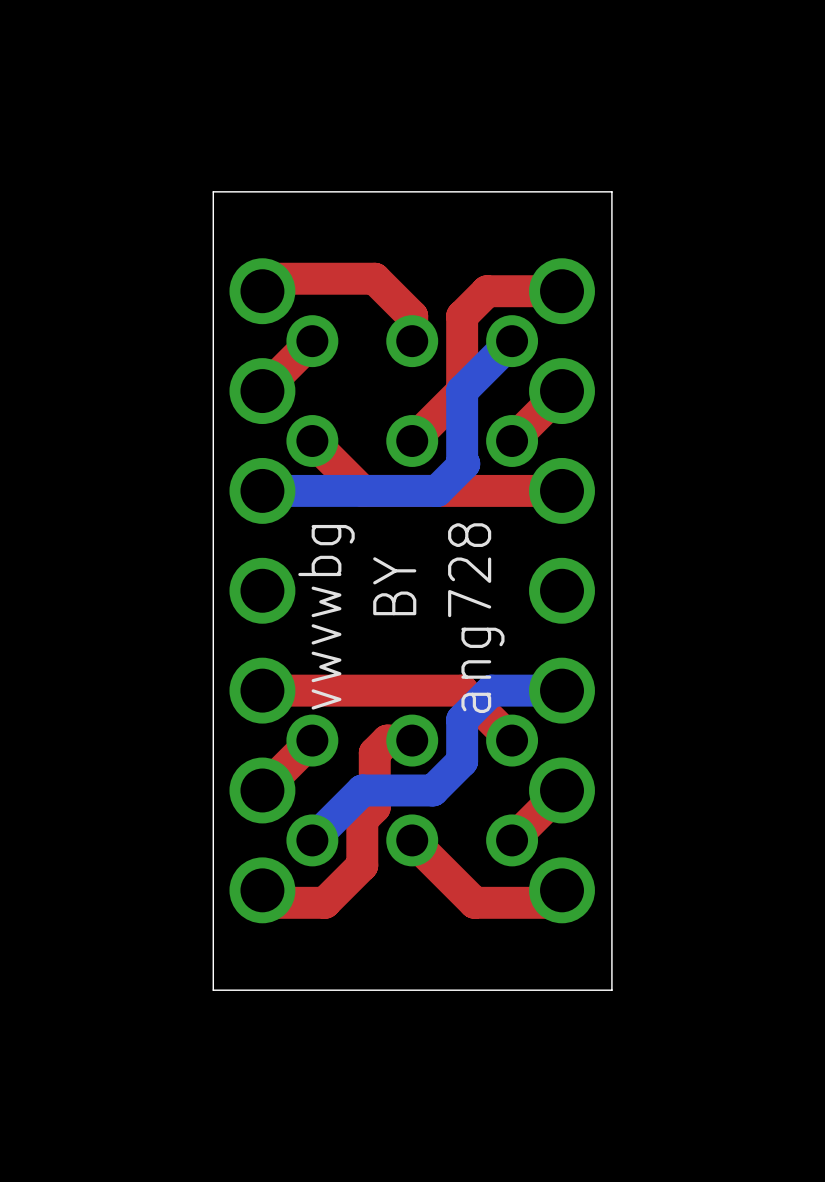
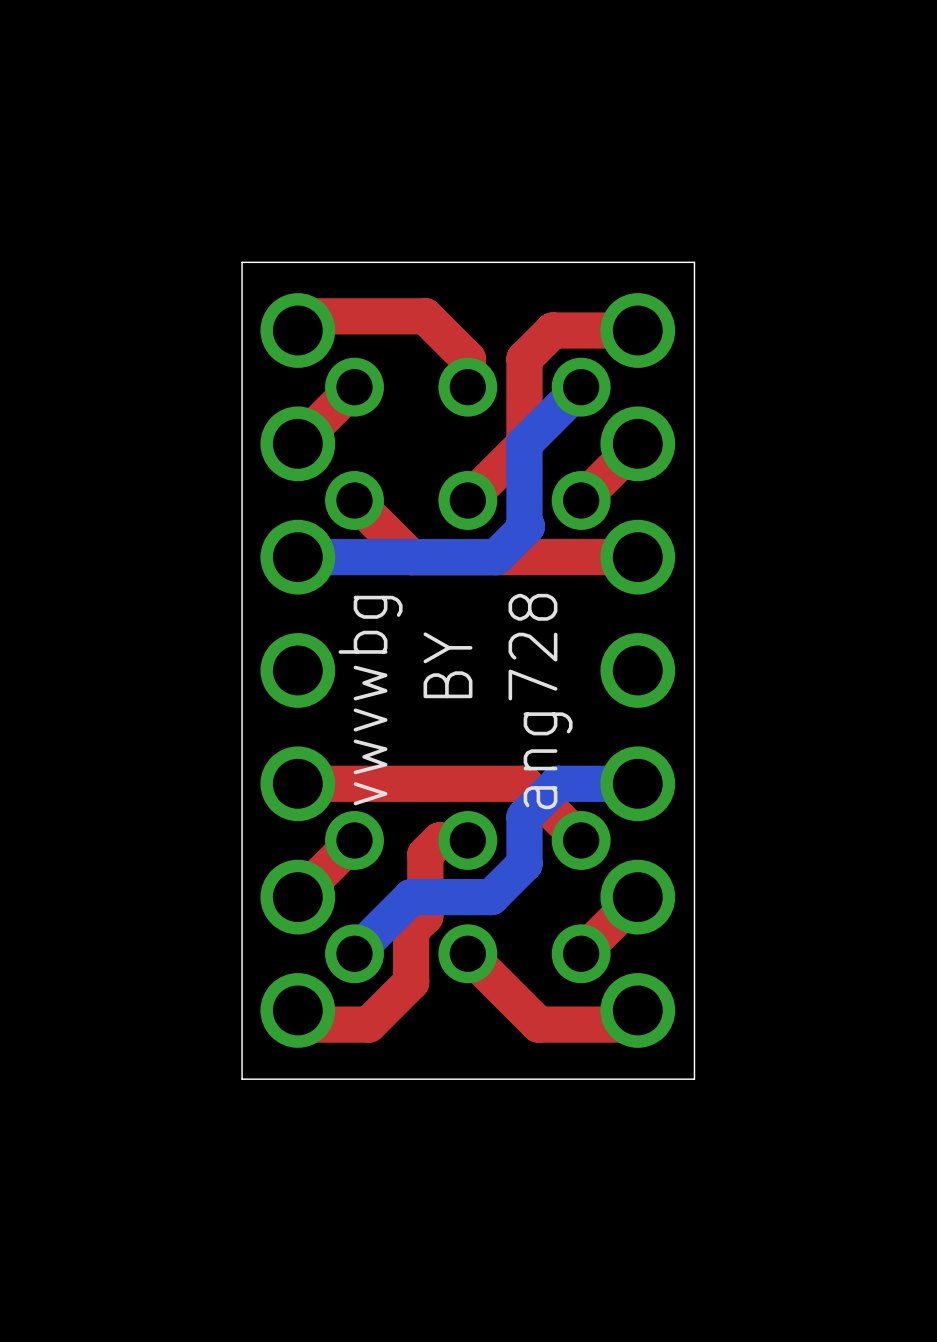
board edge: (611, 231) (611, 191) (213, 191) (213, 231) -> (694, 262) (242, 262)
board edge: (611, 950) (611, 990) (213, 990) (213, 950) -> (694, 1079) (242, 1079)

